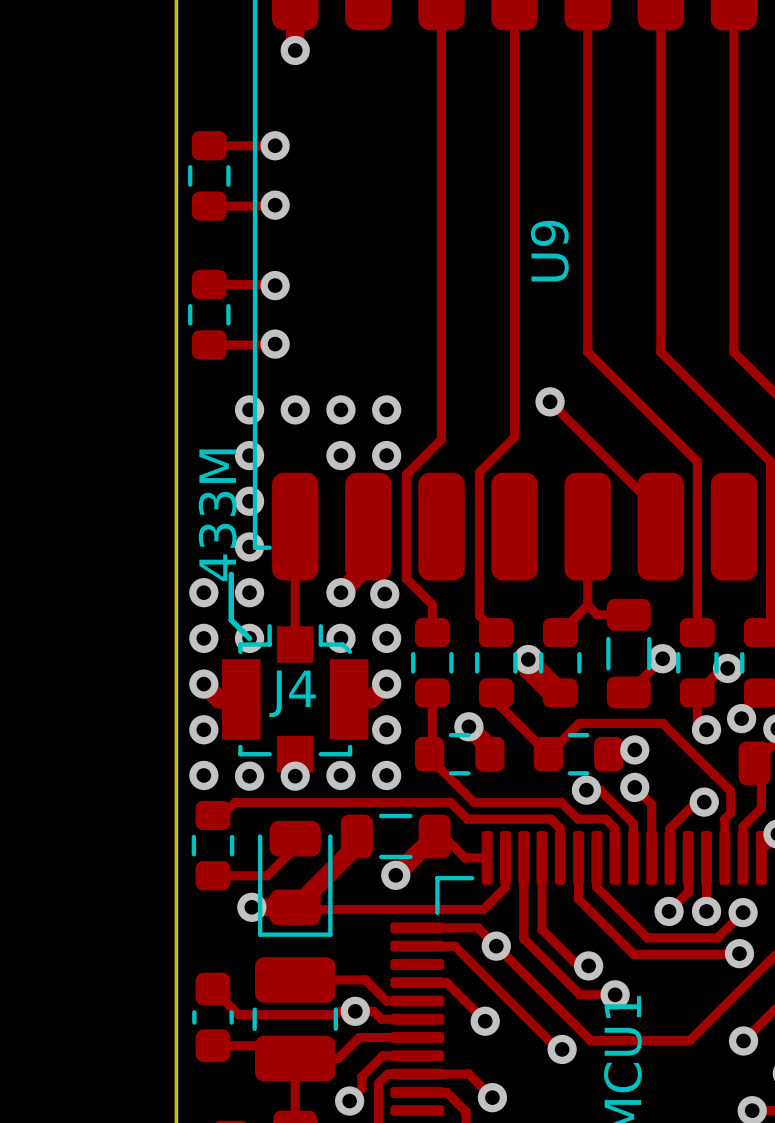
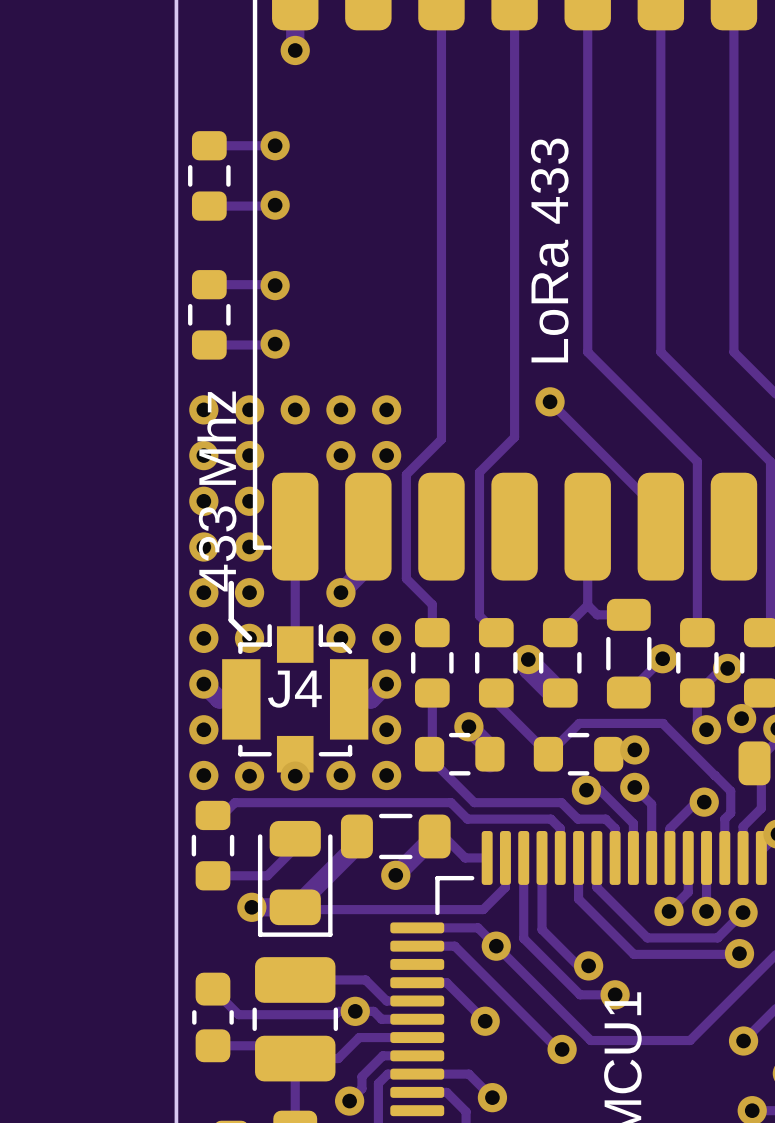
U9 name: U9 (549, 251) -> LoRa 433 (549, 250)
via: none -> (203, 409)
via: none -> (203, 455)
via: none -> (203, 501)
text: 433M (217, 515) -> 433 Mhz (216, 491)
via: none -> (203, 546)
line: (231, 574) (231, 583) -> none
via: (384, 594) -> none

